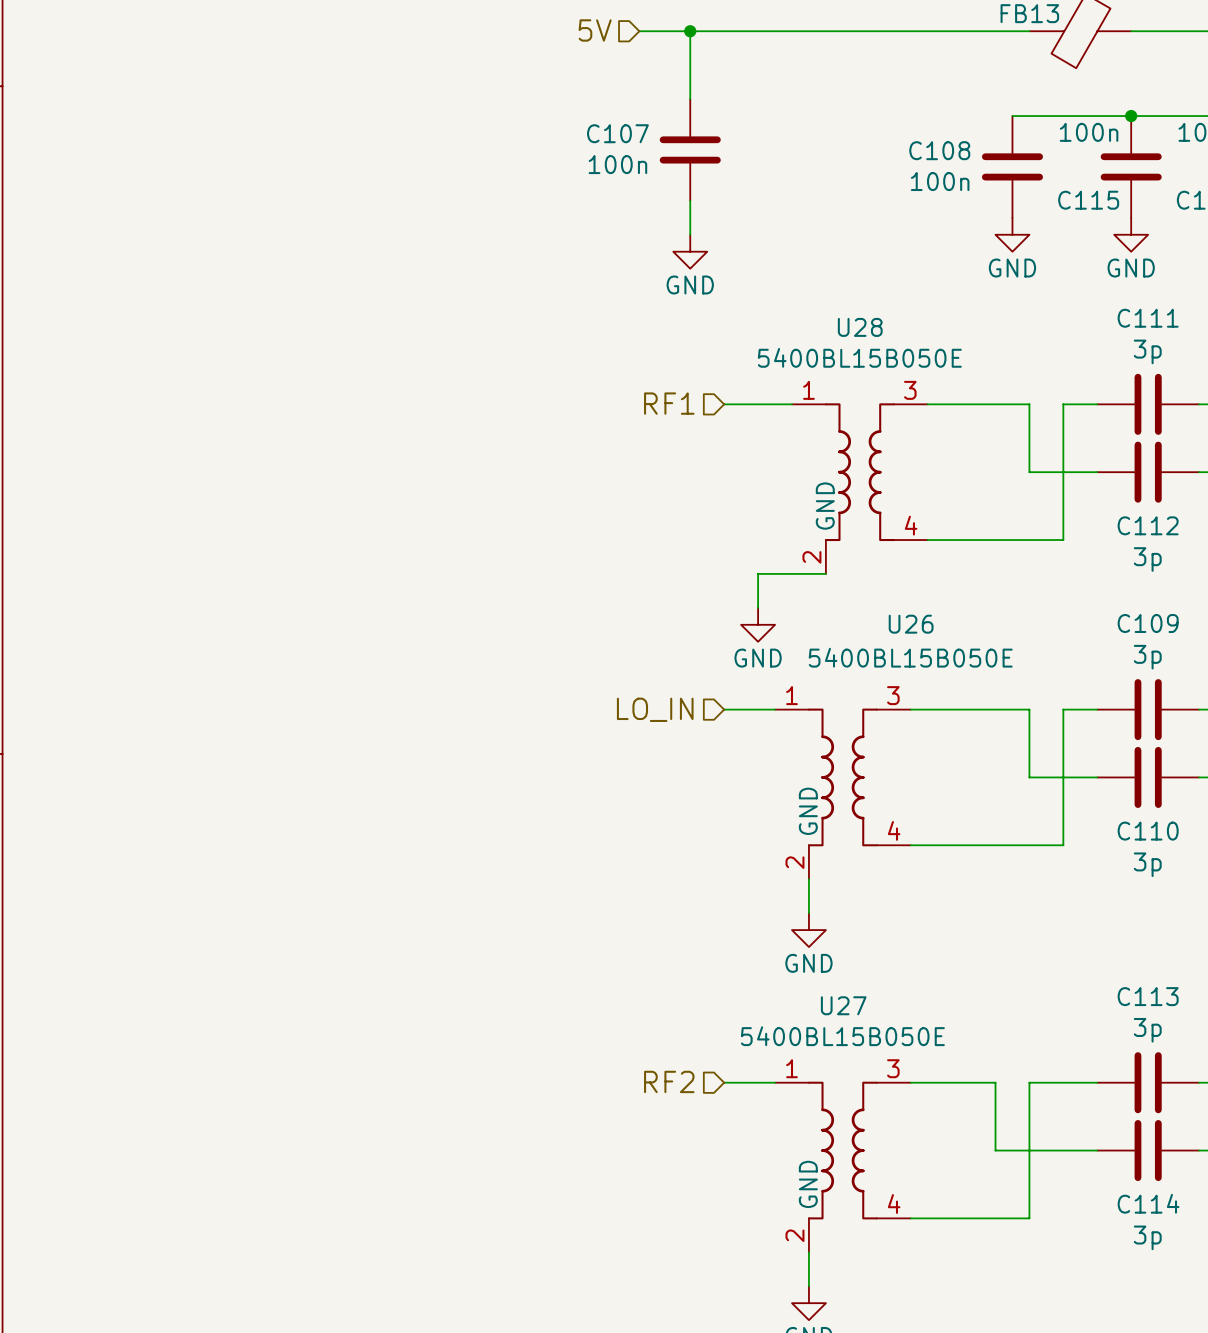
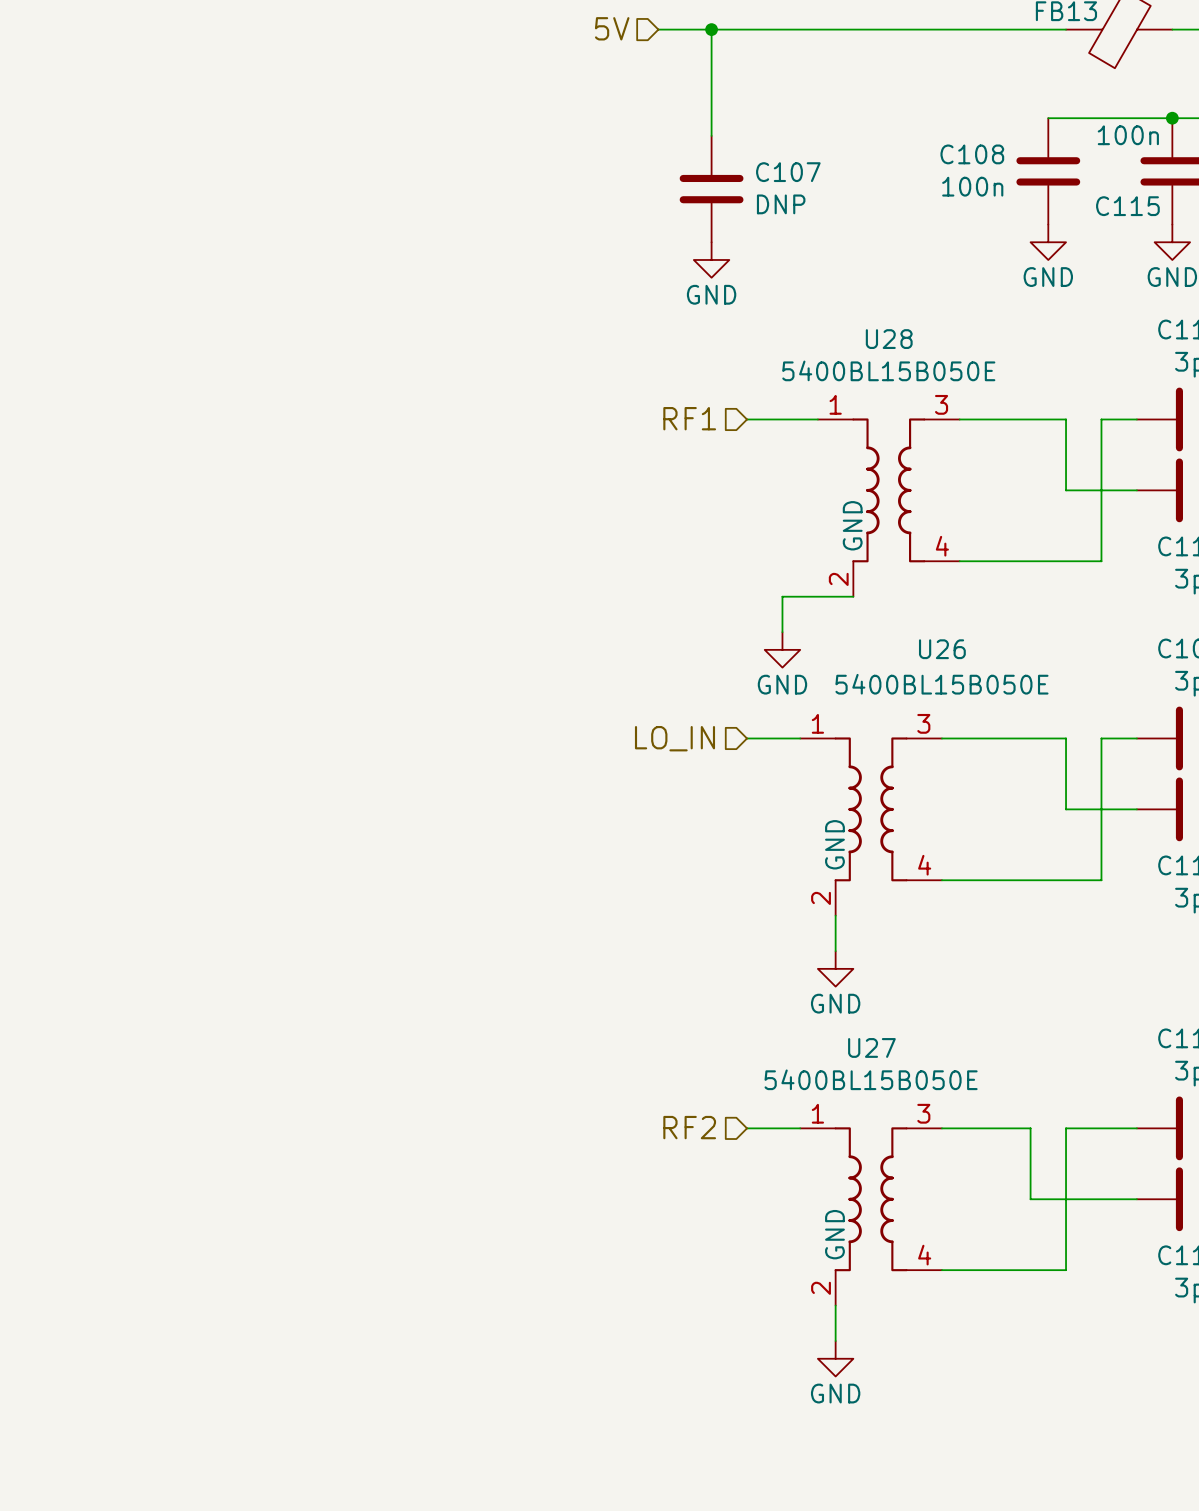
C107 name position: C107 (617, 133) -> C107 (788, 172)
C107 position: (690, 149) -> (711, 189)
C107 value: 100n (617, 164) -> DNP (781, 204)

